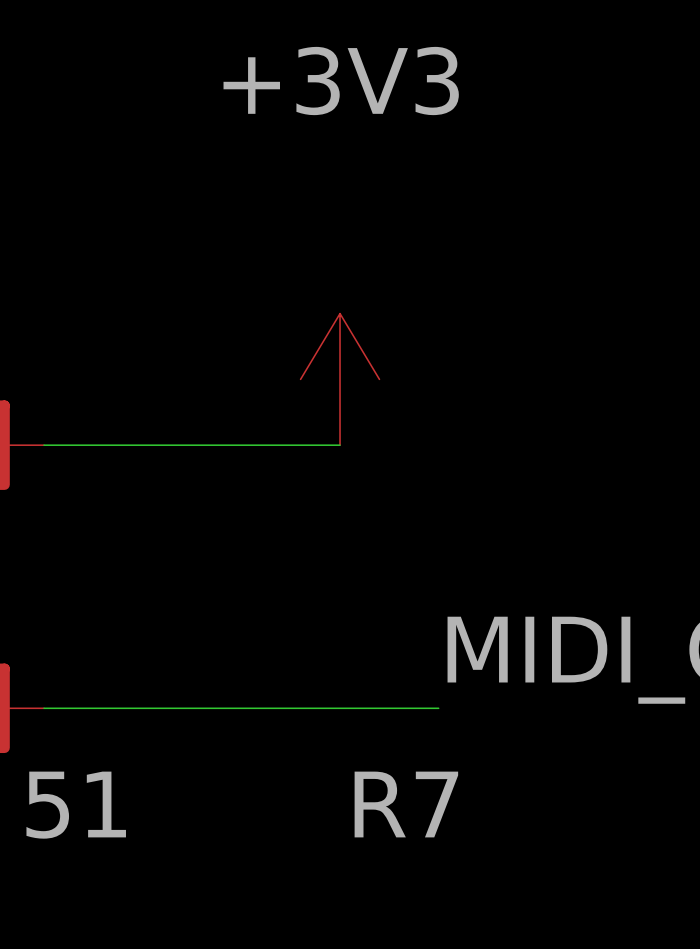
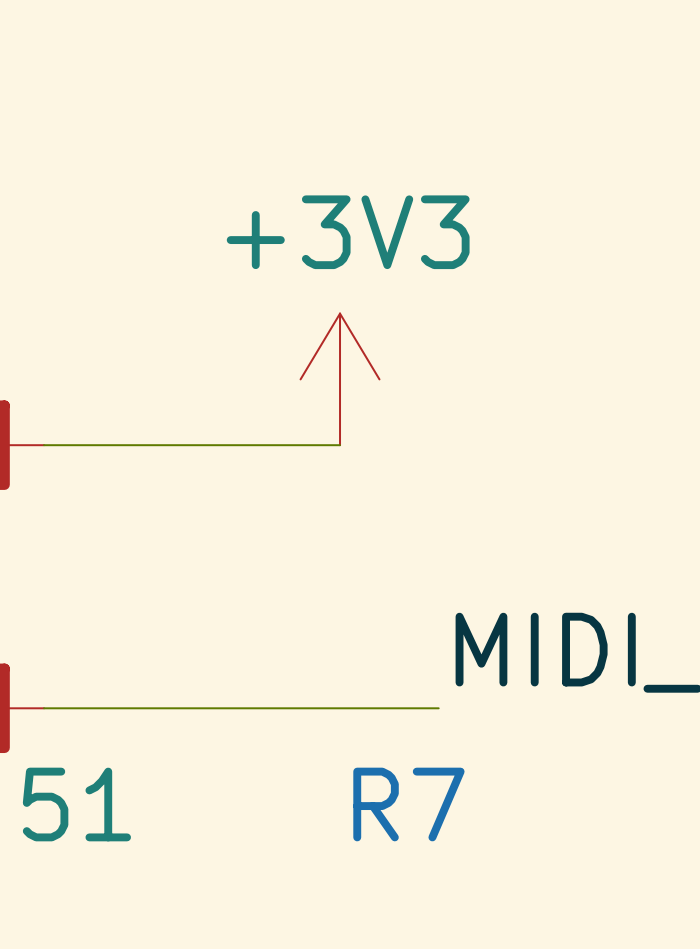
power symbol text position: +3V3 (341, 81) -> +3V3 (348, 232)

